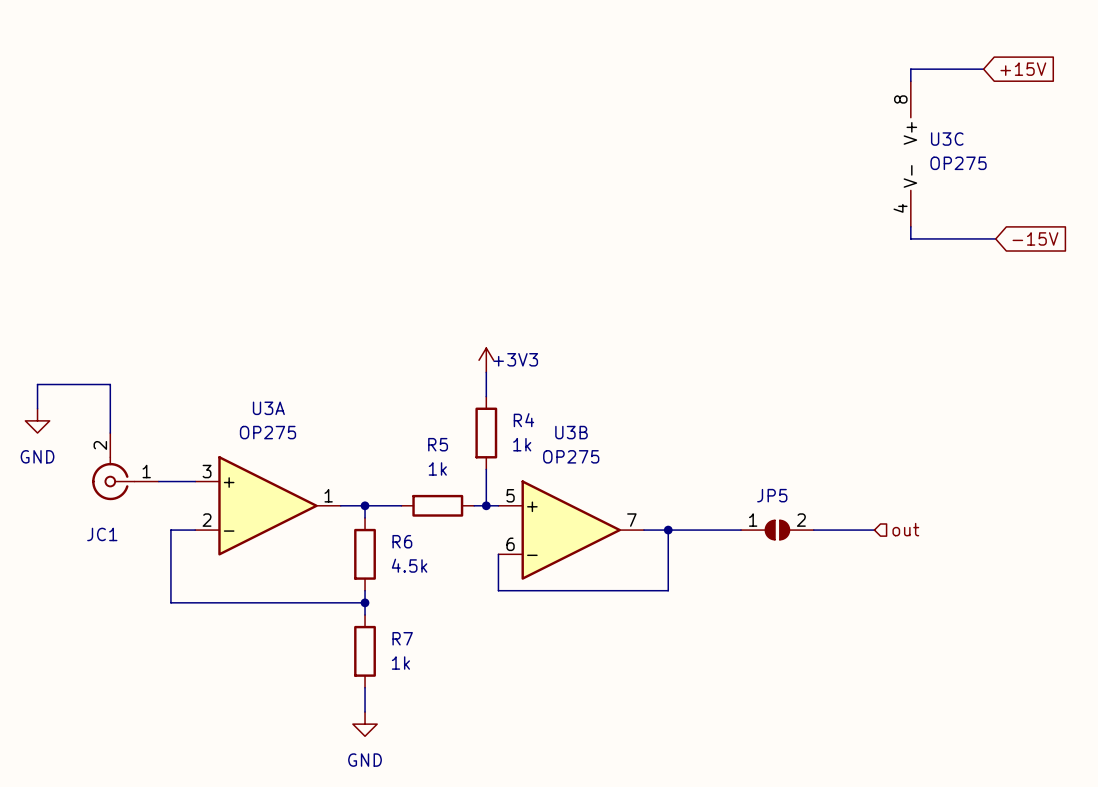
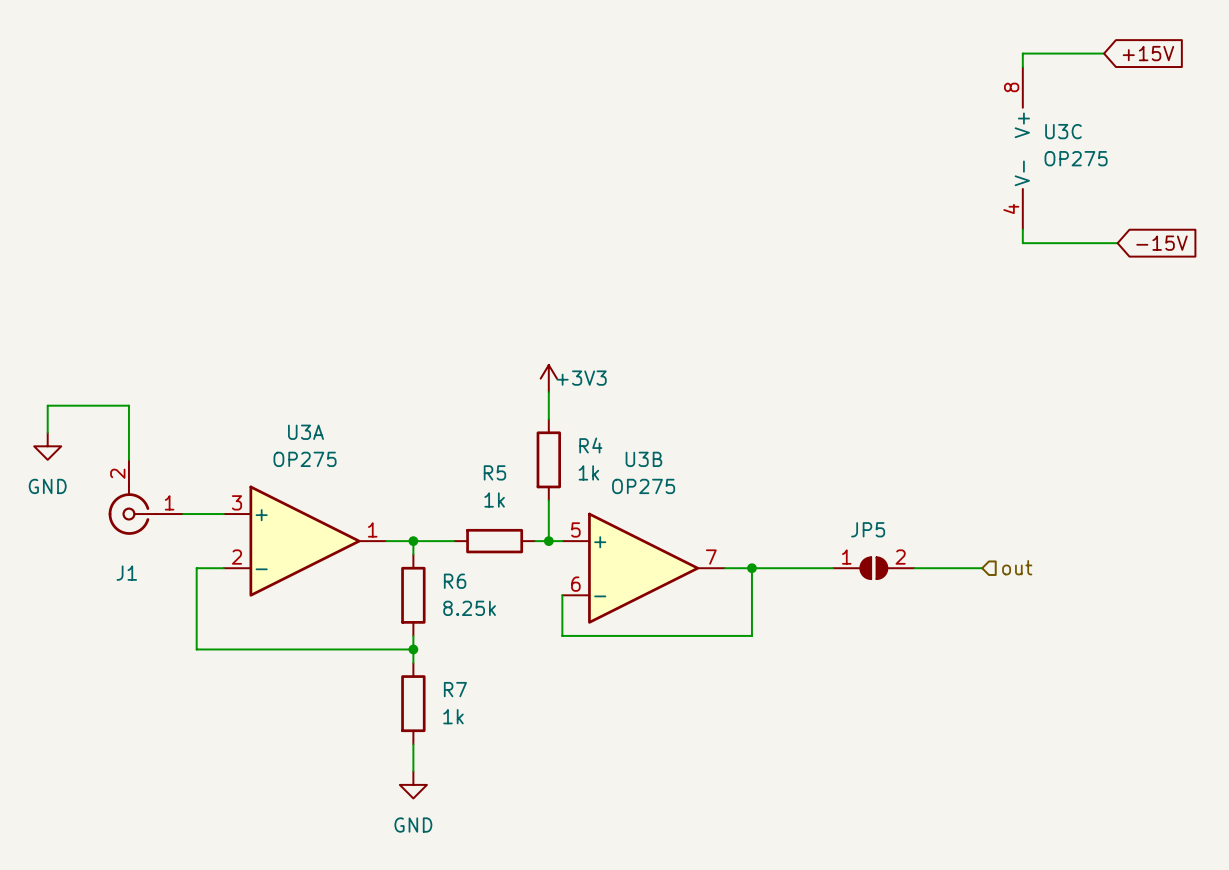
JC1 name: JC1 (102, 534) -> J1 (126, 573)
R6 value: 4.5k (409, 565) -> 8.25k (469, 608)

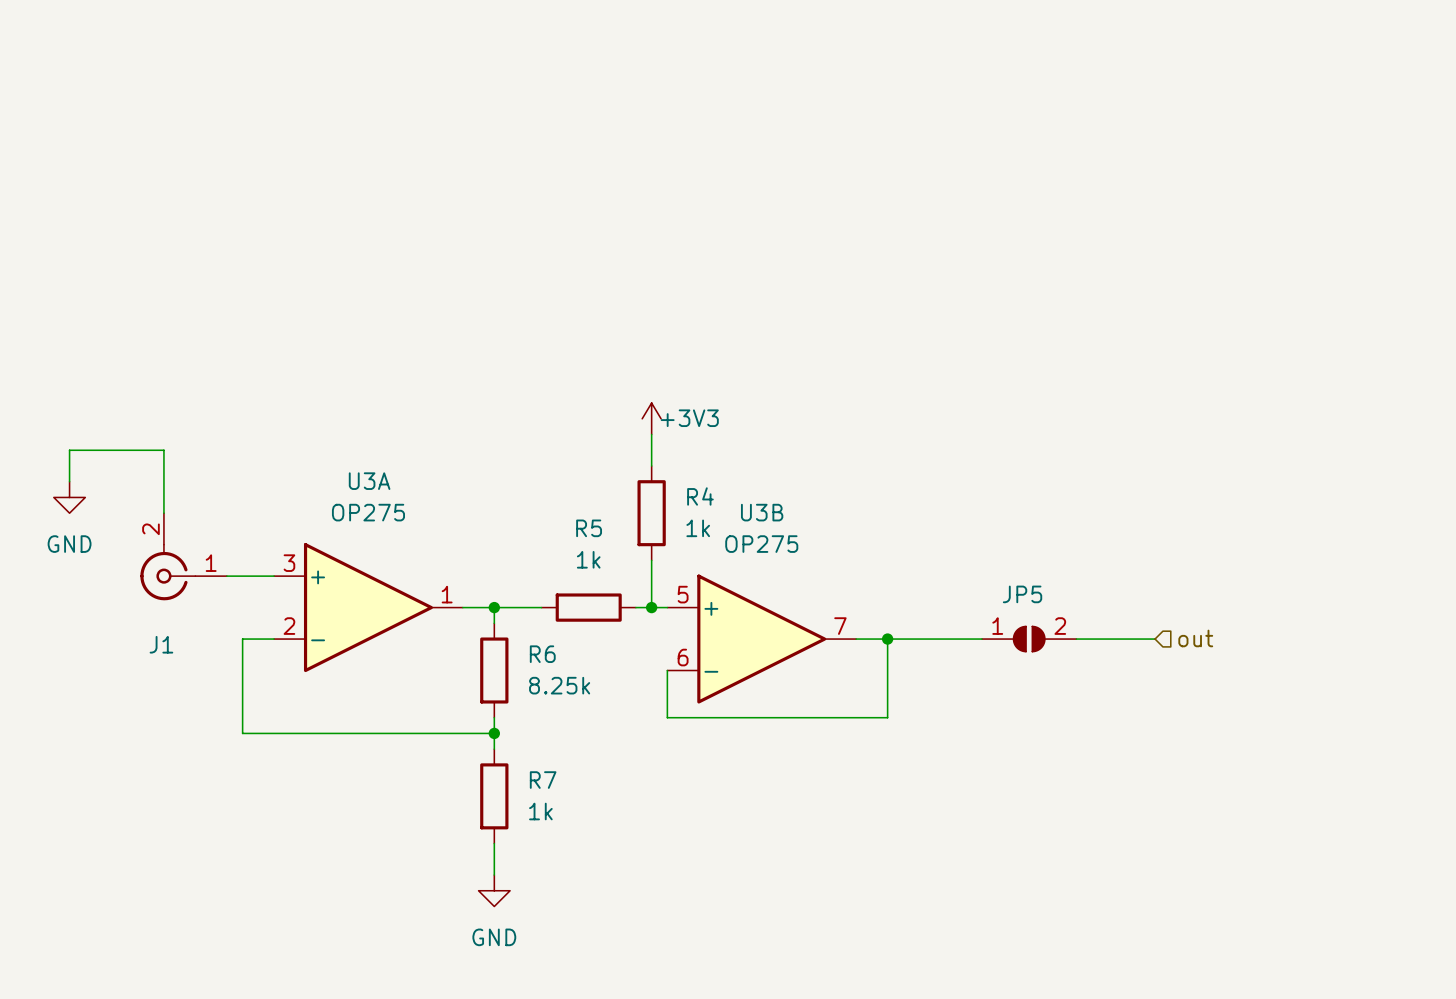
wire: (1104, 53) (1022, 53) (1022, 67) -> none
global label: +15V (1148, 53) -> none
U3C: OP275 (1022, 148) -> none
wire: (1022, 229) (1022, 243) (1117, 243) -> none
global label: -15V (1161, 243) -> none

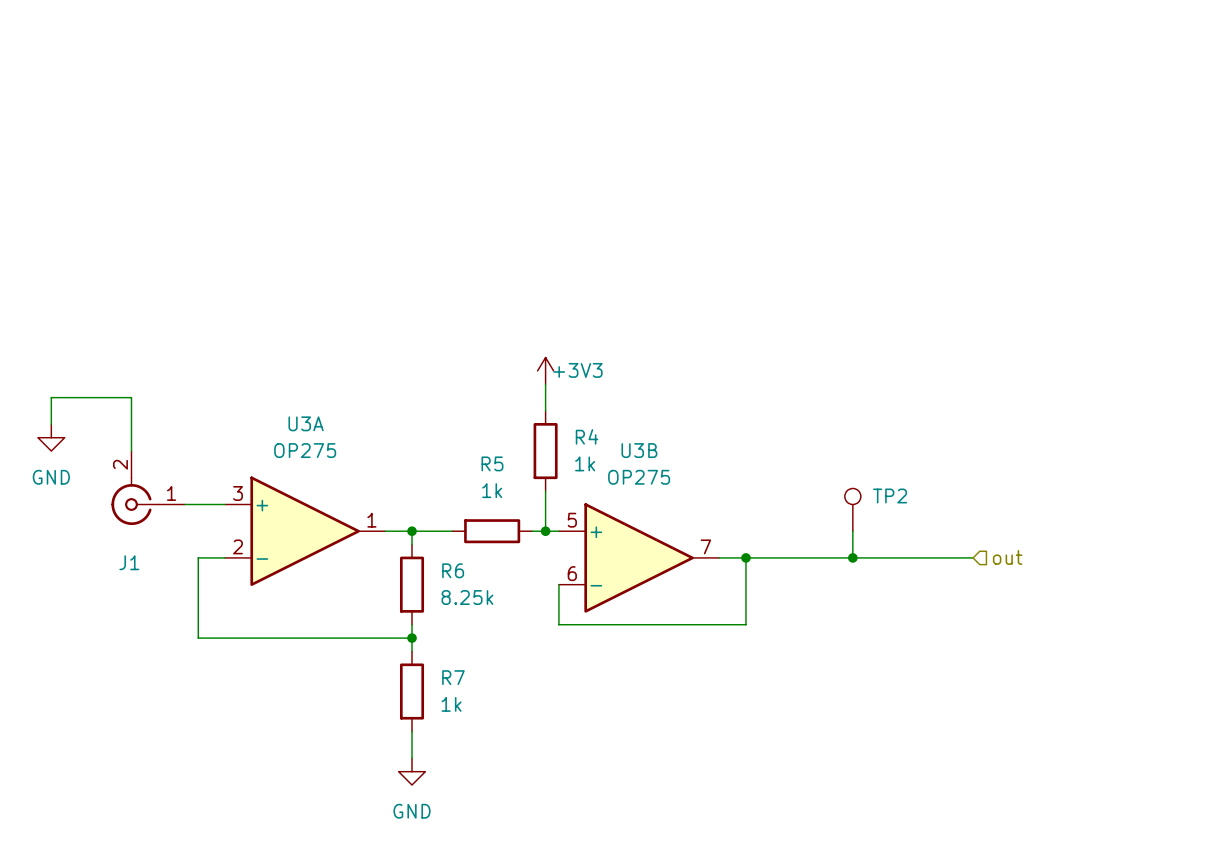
TP2: none -> (852, 509)
wire: none -> (852, 531) (852, 557)
junction: none -> (852, 557)
JP5: (1029, 639) -> none

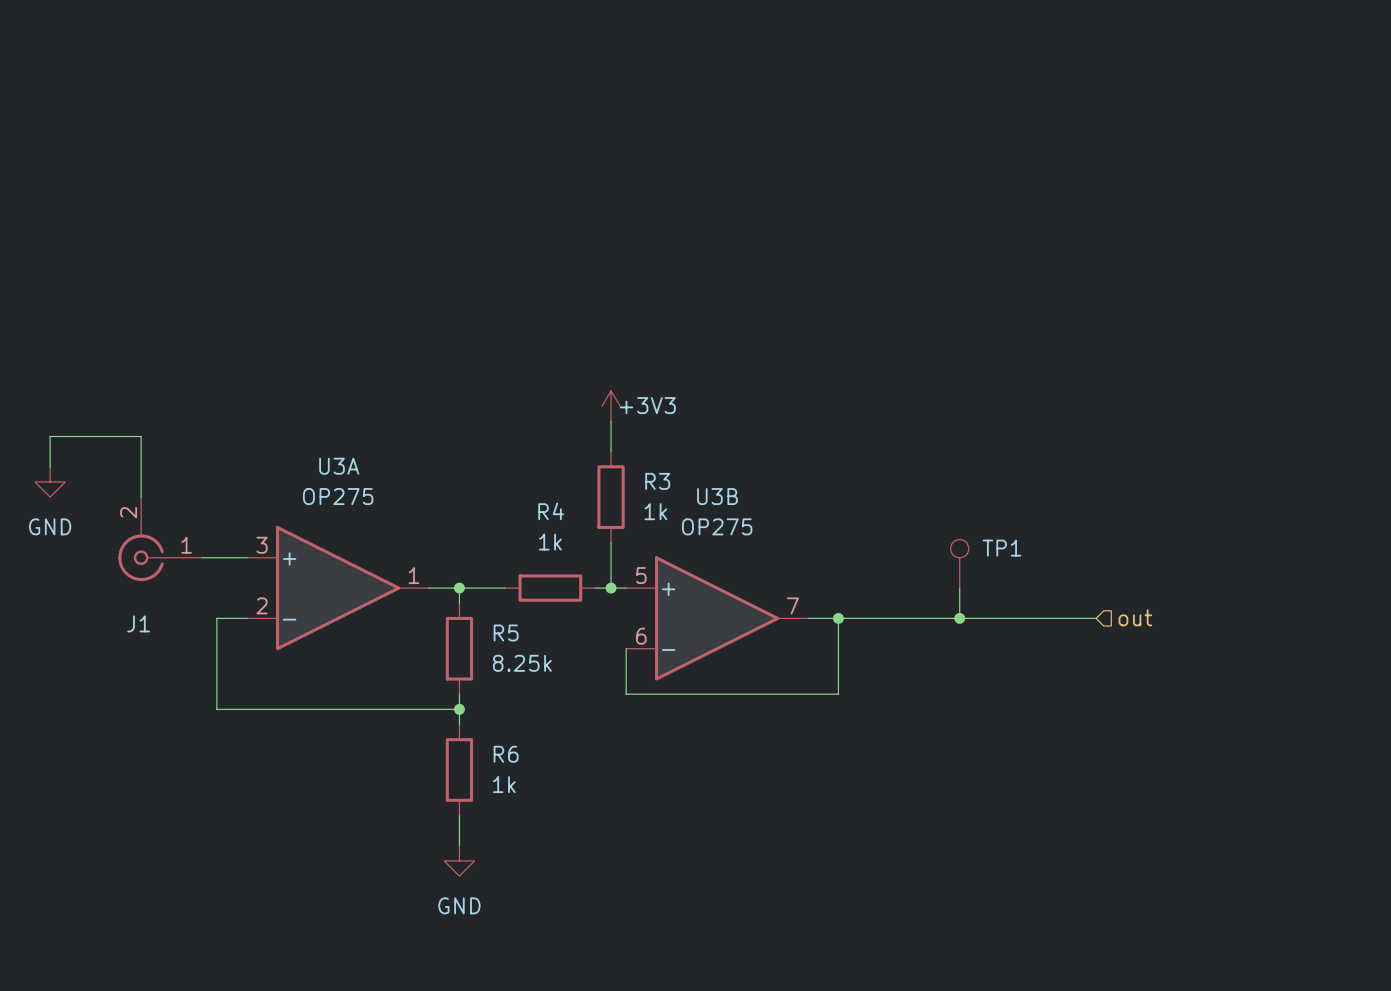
R4 name: R4 (587, 436) -> R3 (657, 481)
R5 name: R5 (492, 463) -> R4 (551, 511)
TP2 name: TP2 (890, 495) -> TP1 (1001, 548)
R6 name: R6 (453, 570) -> R5 (506, 632)
R7 name: R7 (453, 677) -> R6 (506, 754)

